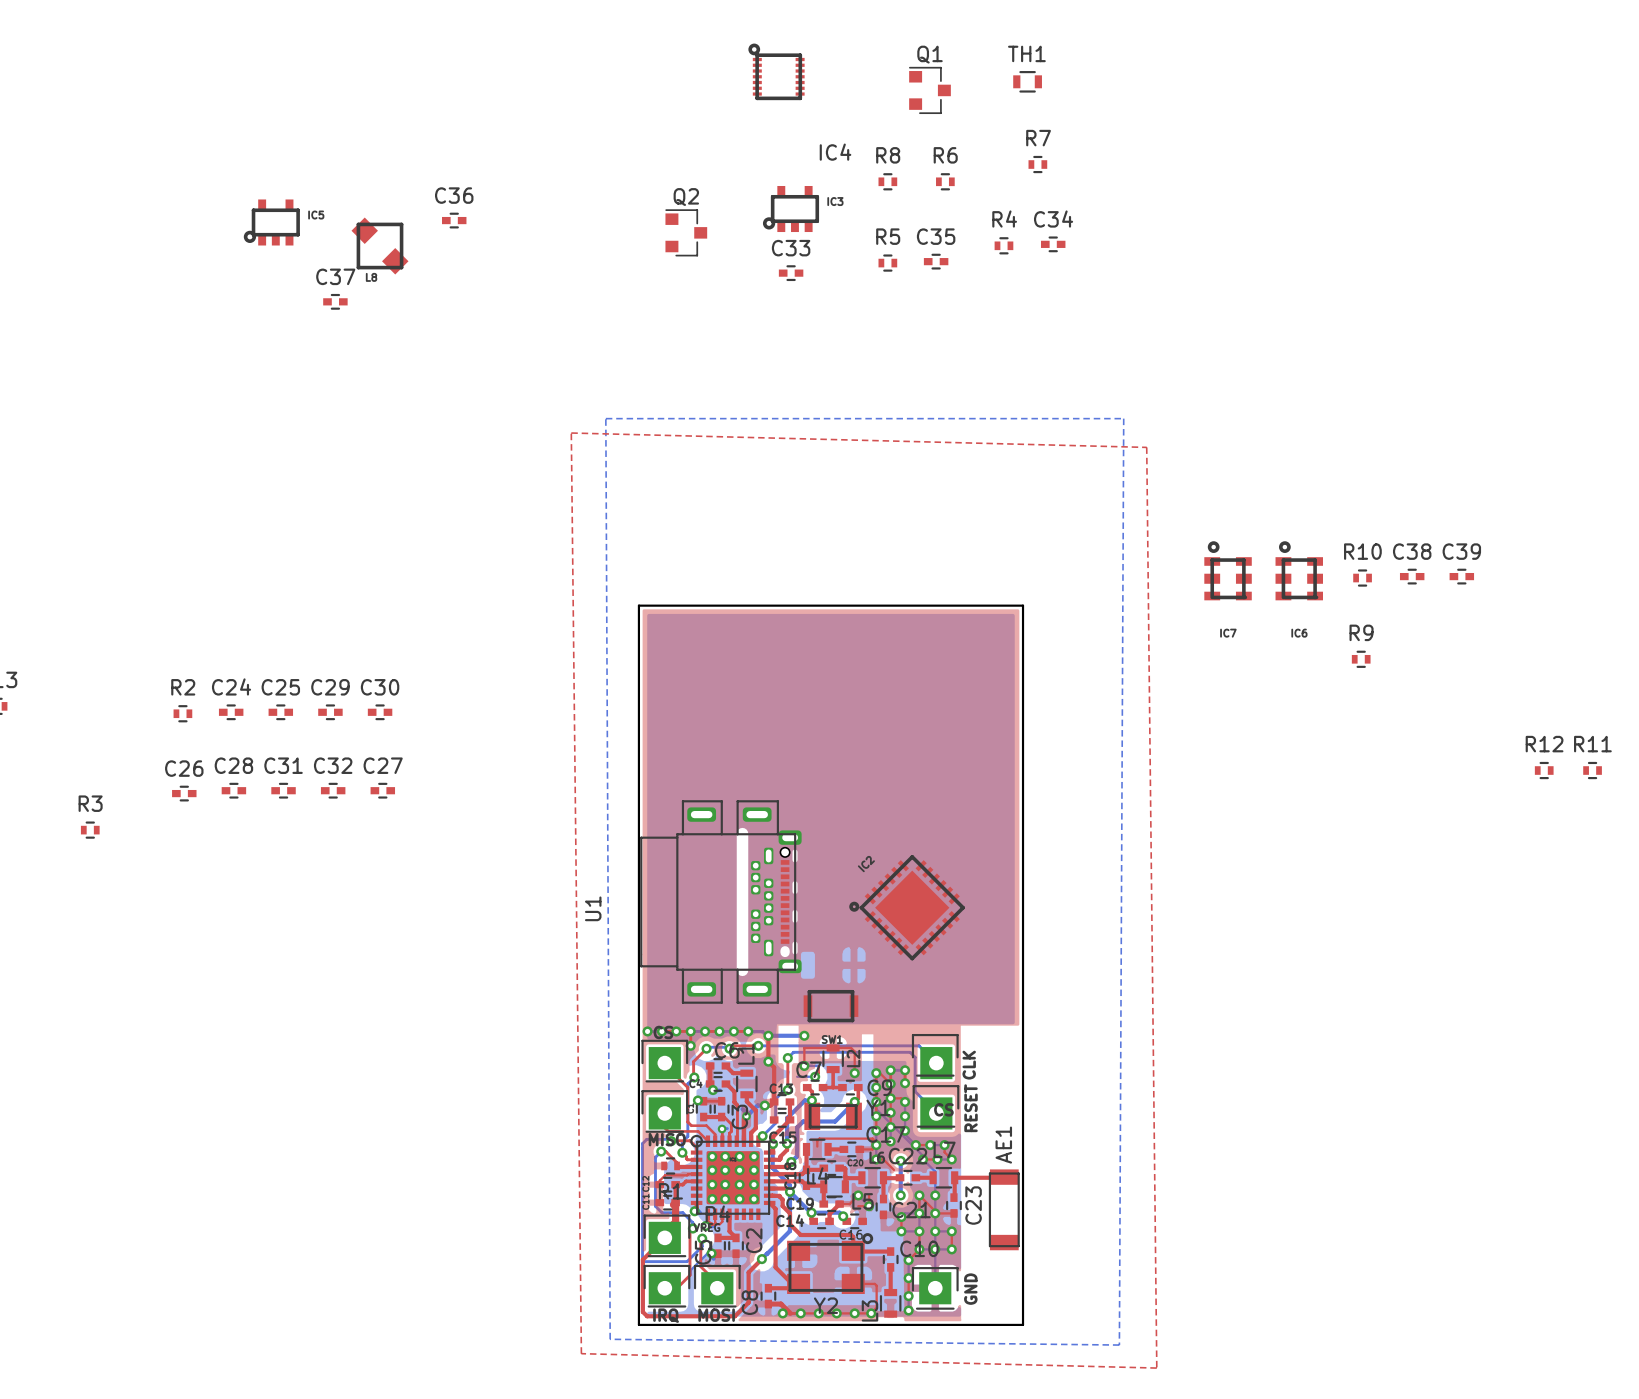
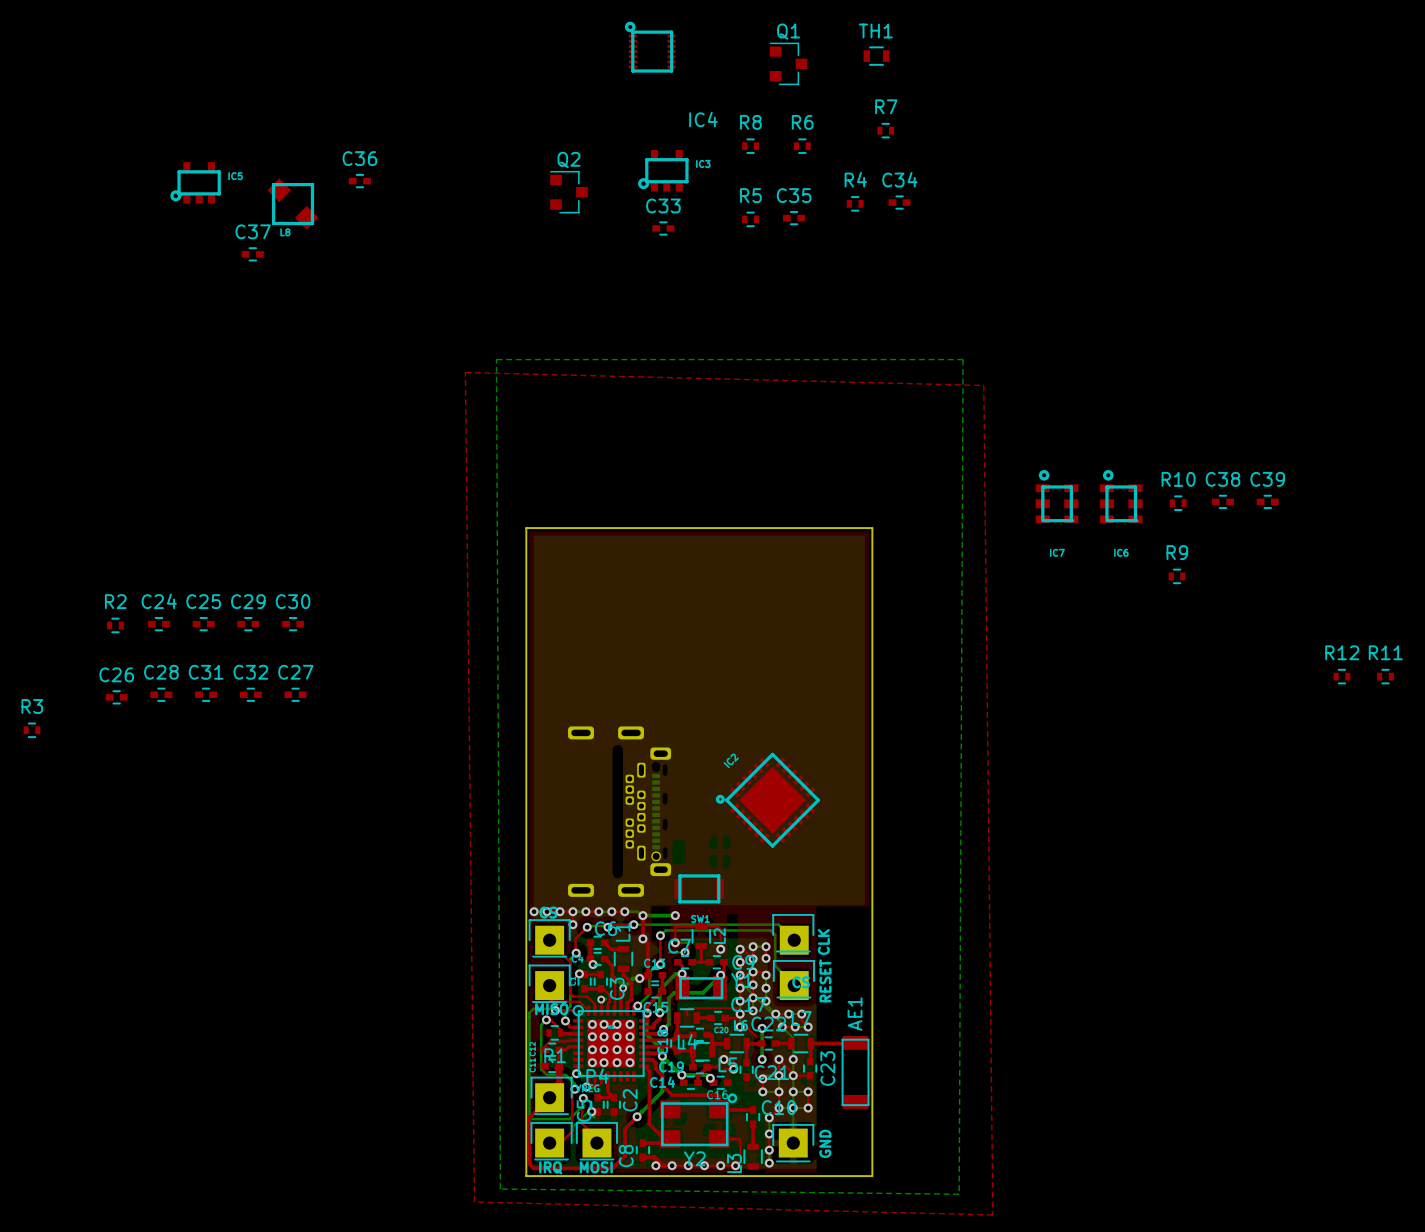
U1 side: top (720, 901) -> bottom (619, 811)

